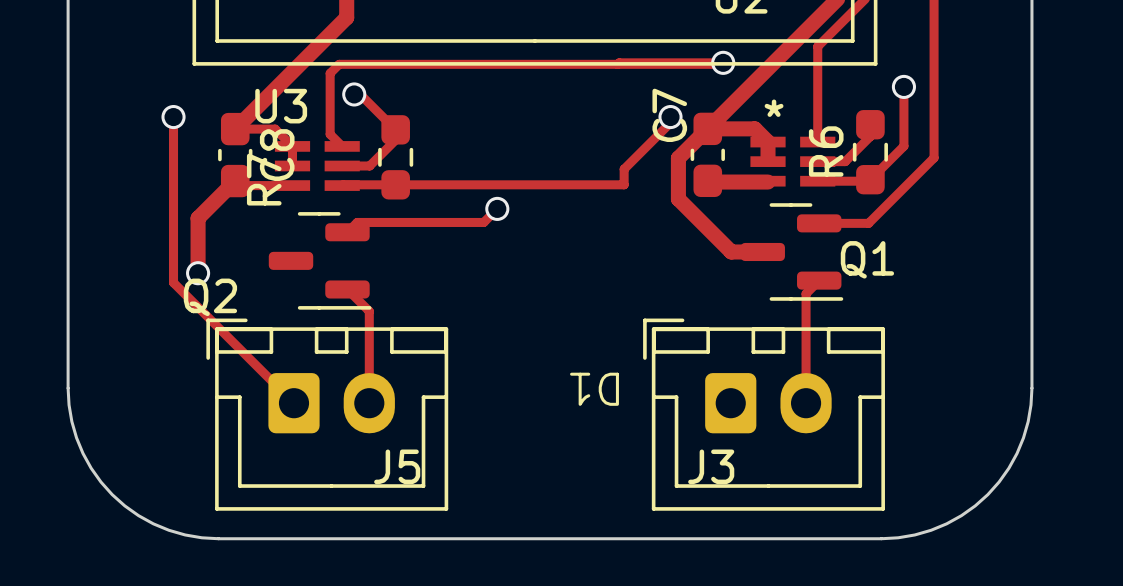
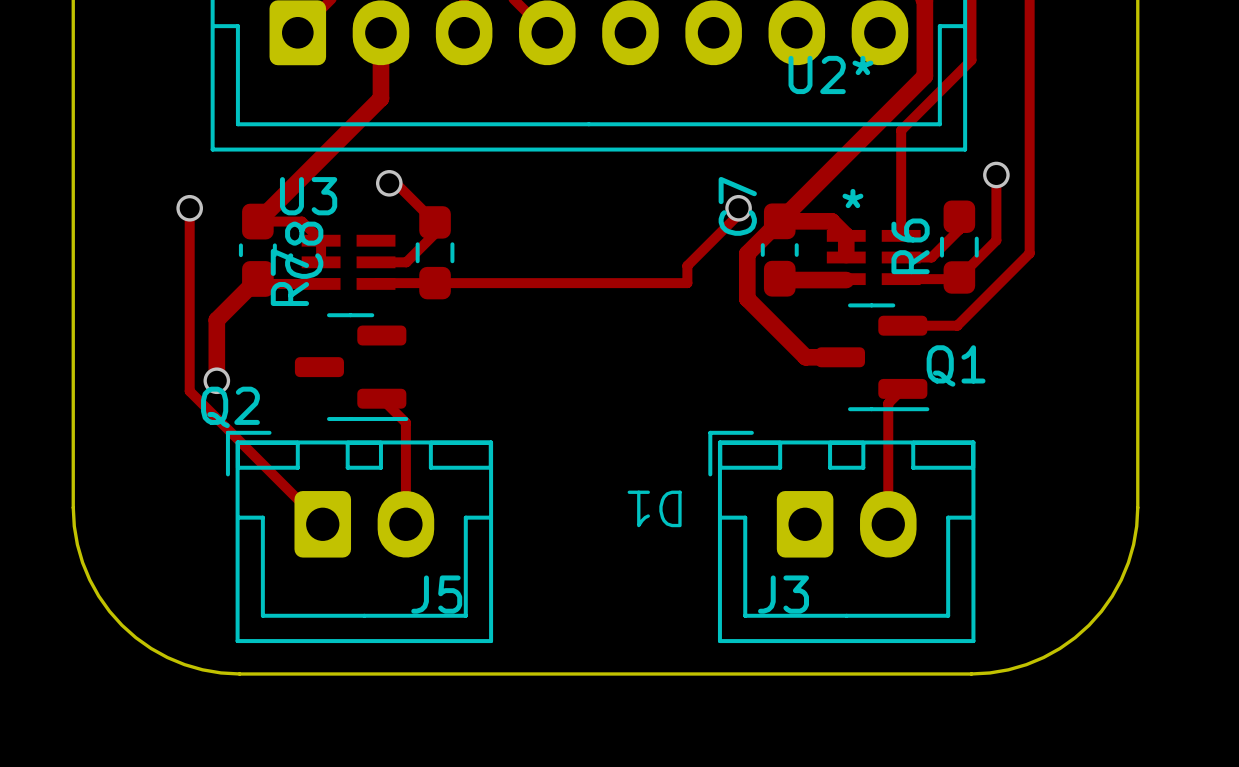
via: (723, 62) -> none
track: (617, 64) (619, 62) (723, 62) (721, 64) (339, 64) (330, 73) (330, 134) (342, 146) -> none
track: (497, 208) (483, 222) (357, 222) (347, 232) -> none
via: (497, 208) -> none

